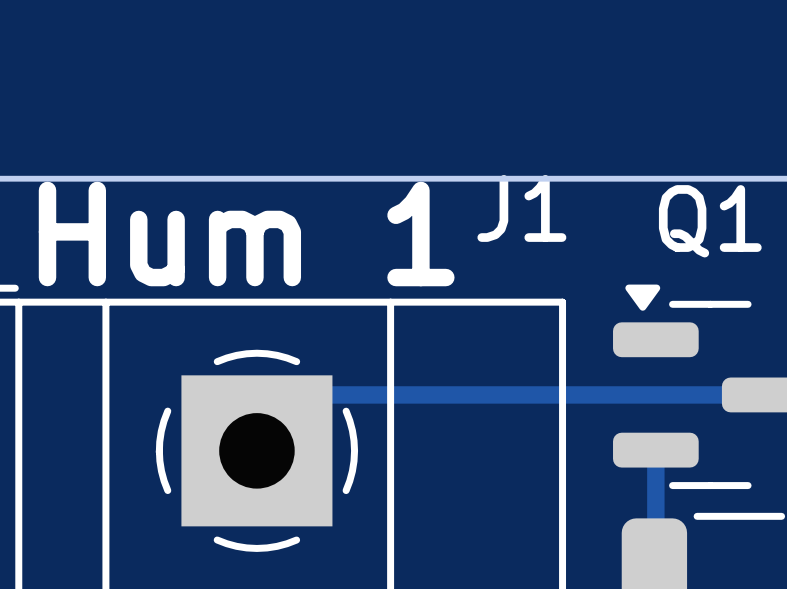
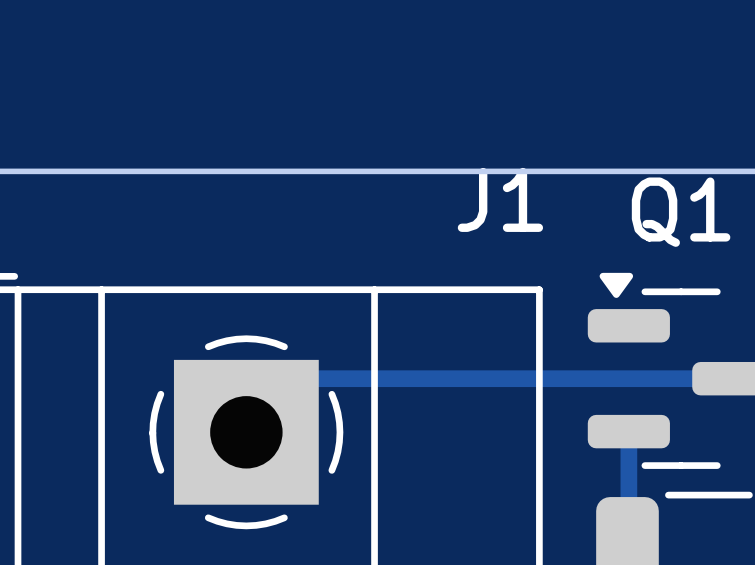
text: Hum 1 (246, 233) -> none

